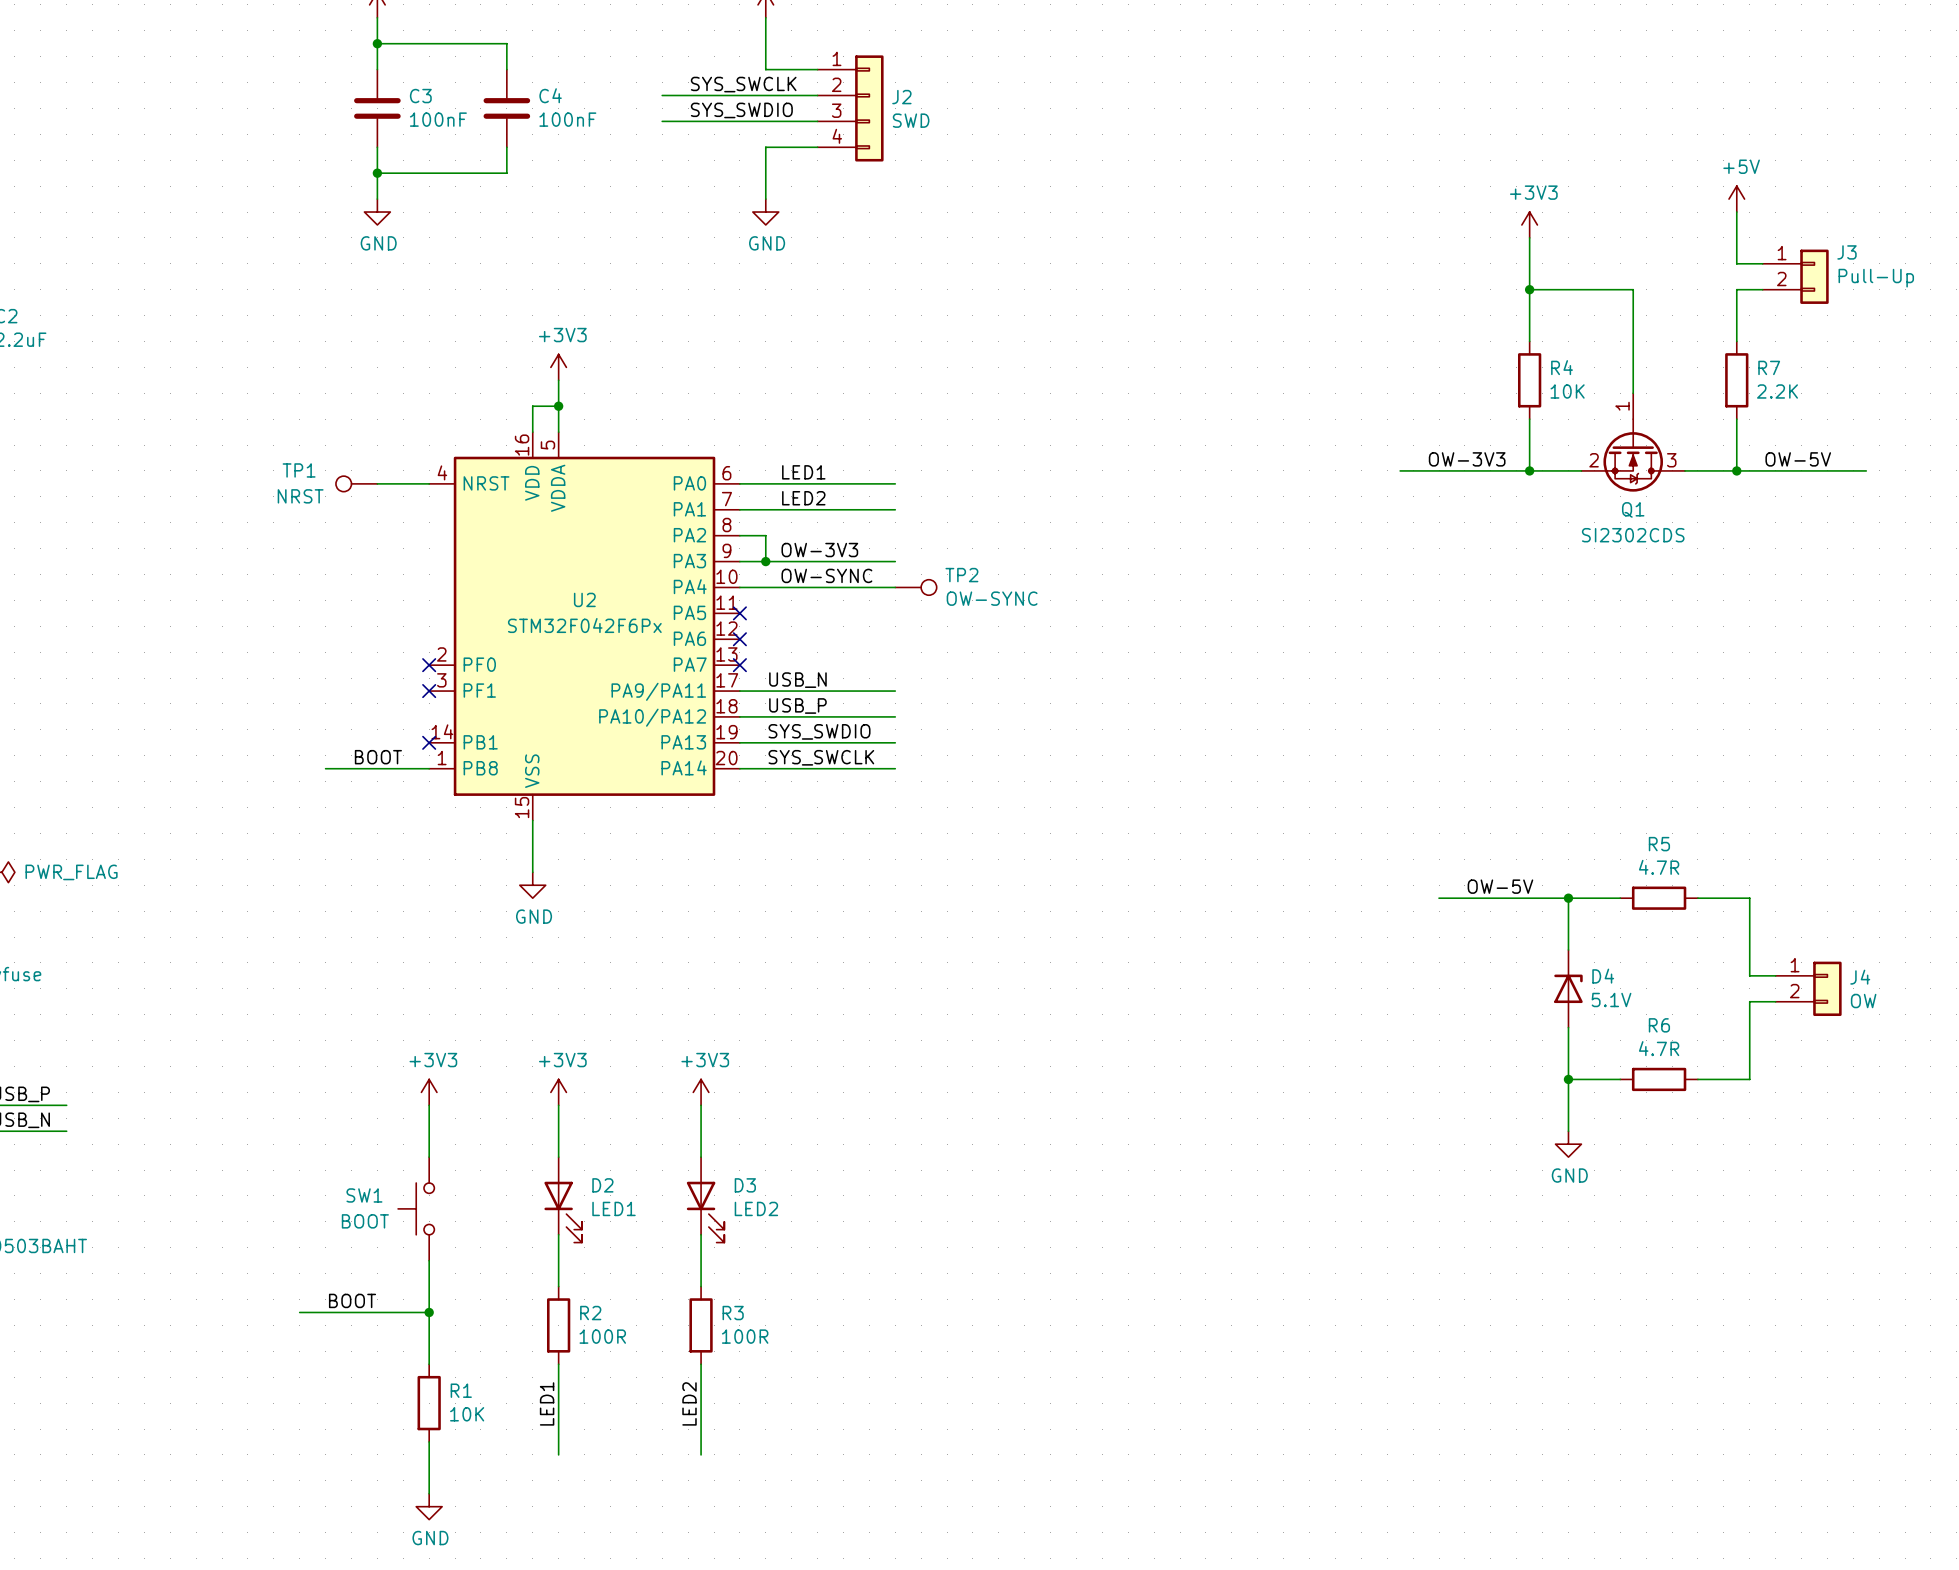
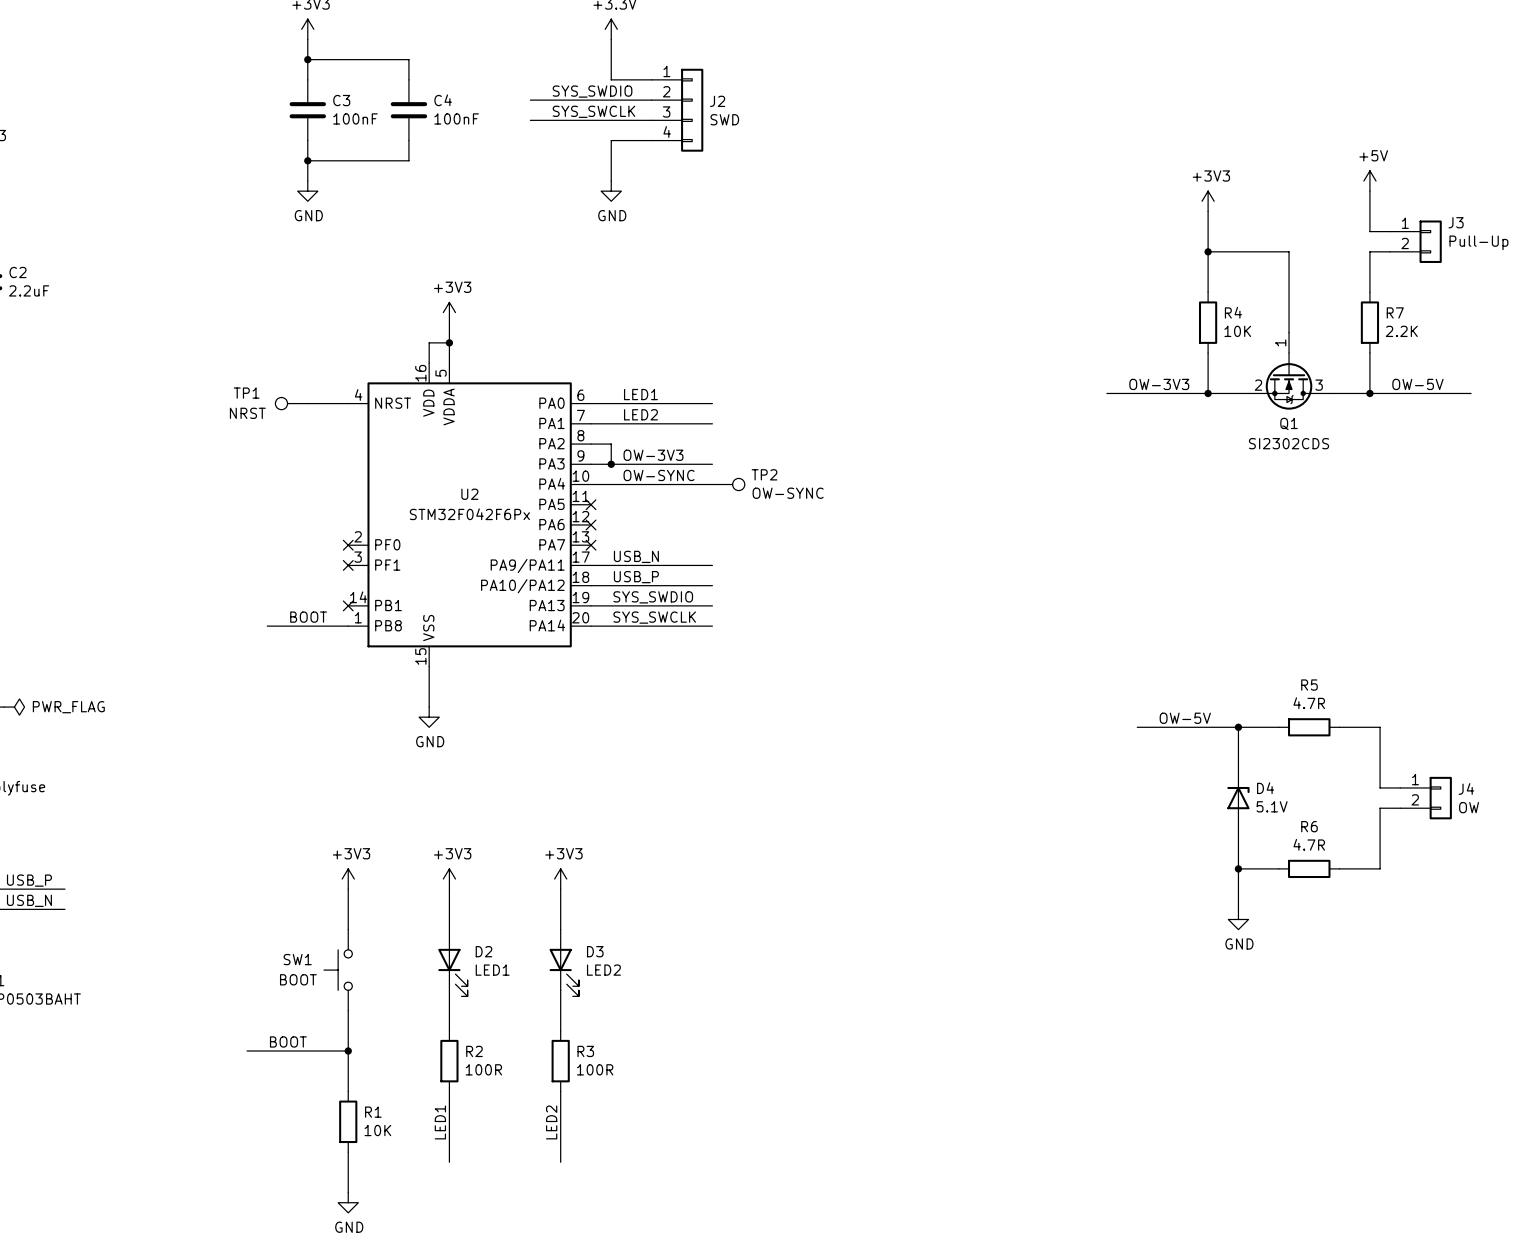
label: SYS_SWCLK (743, 84) -> SYS_SWDIO (592, 91)
label: SYS_SWDIO (741, 110) -> SYS_SWCLK (593, 111)

